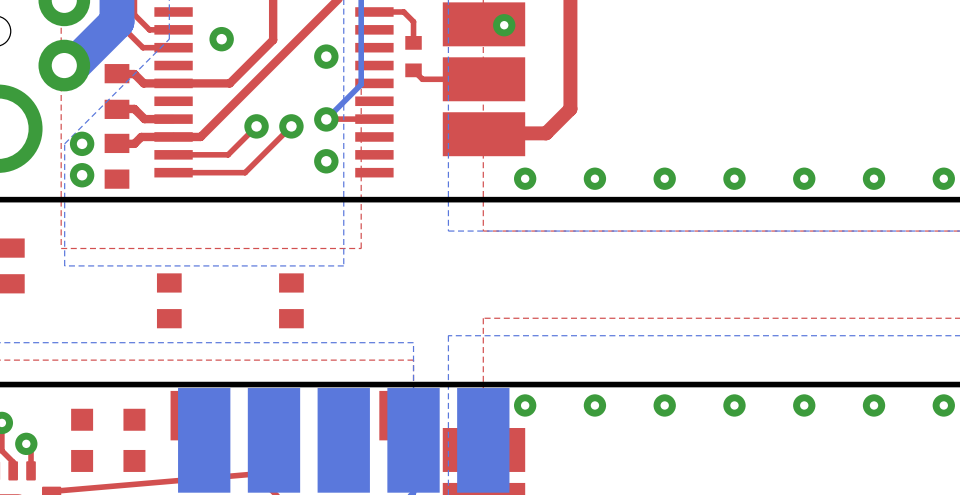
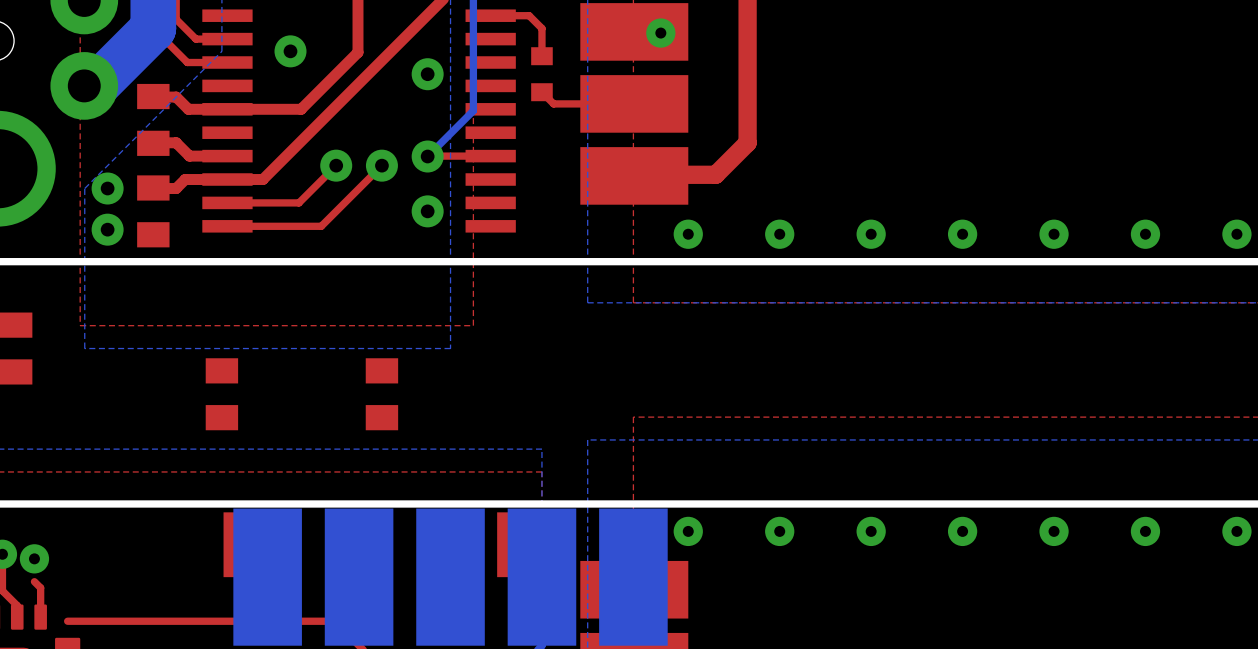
part: (82, 440) -> none
part: (134, 440) -> none
via position: (26, 443) -> (34, 558)
top track: (255, 474) (51, 491) -> (334, 621) (67, 621)

